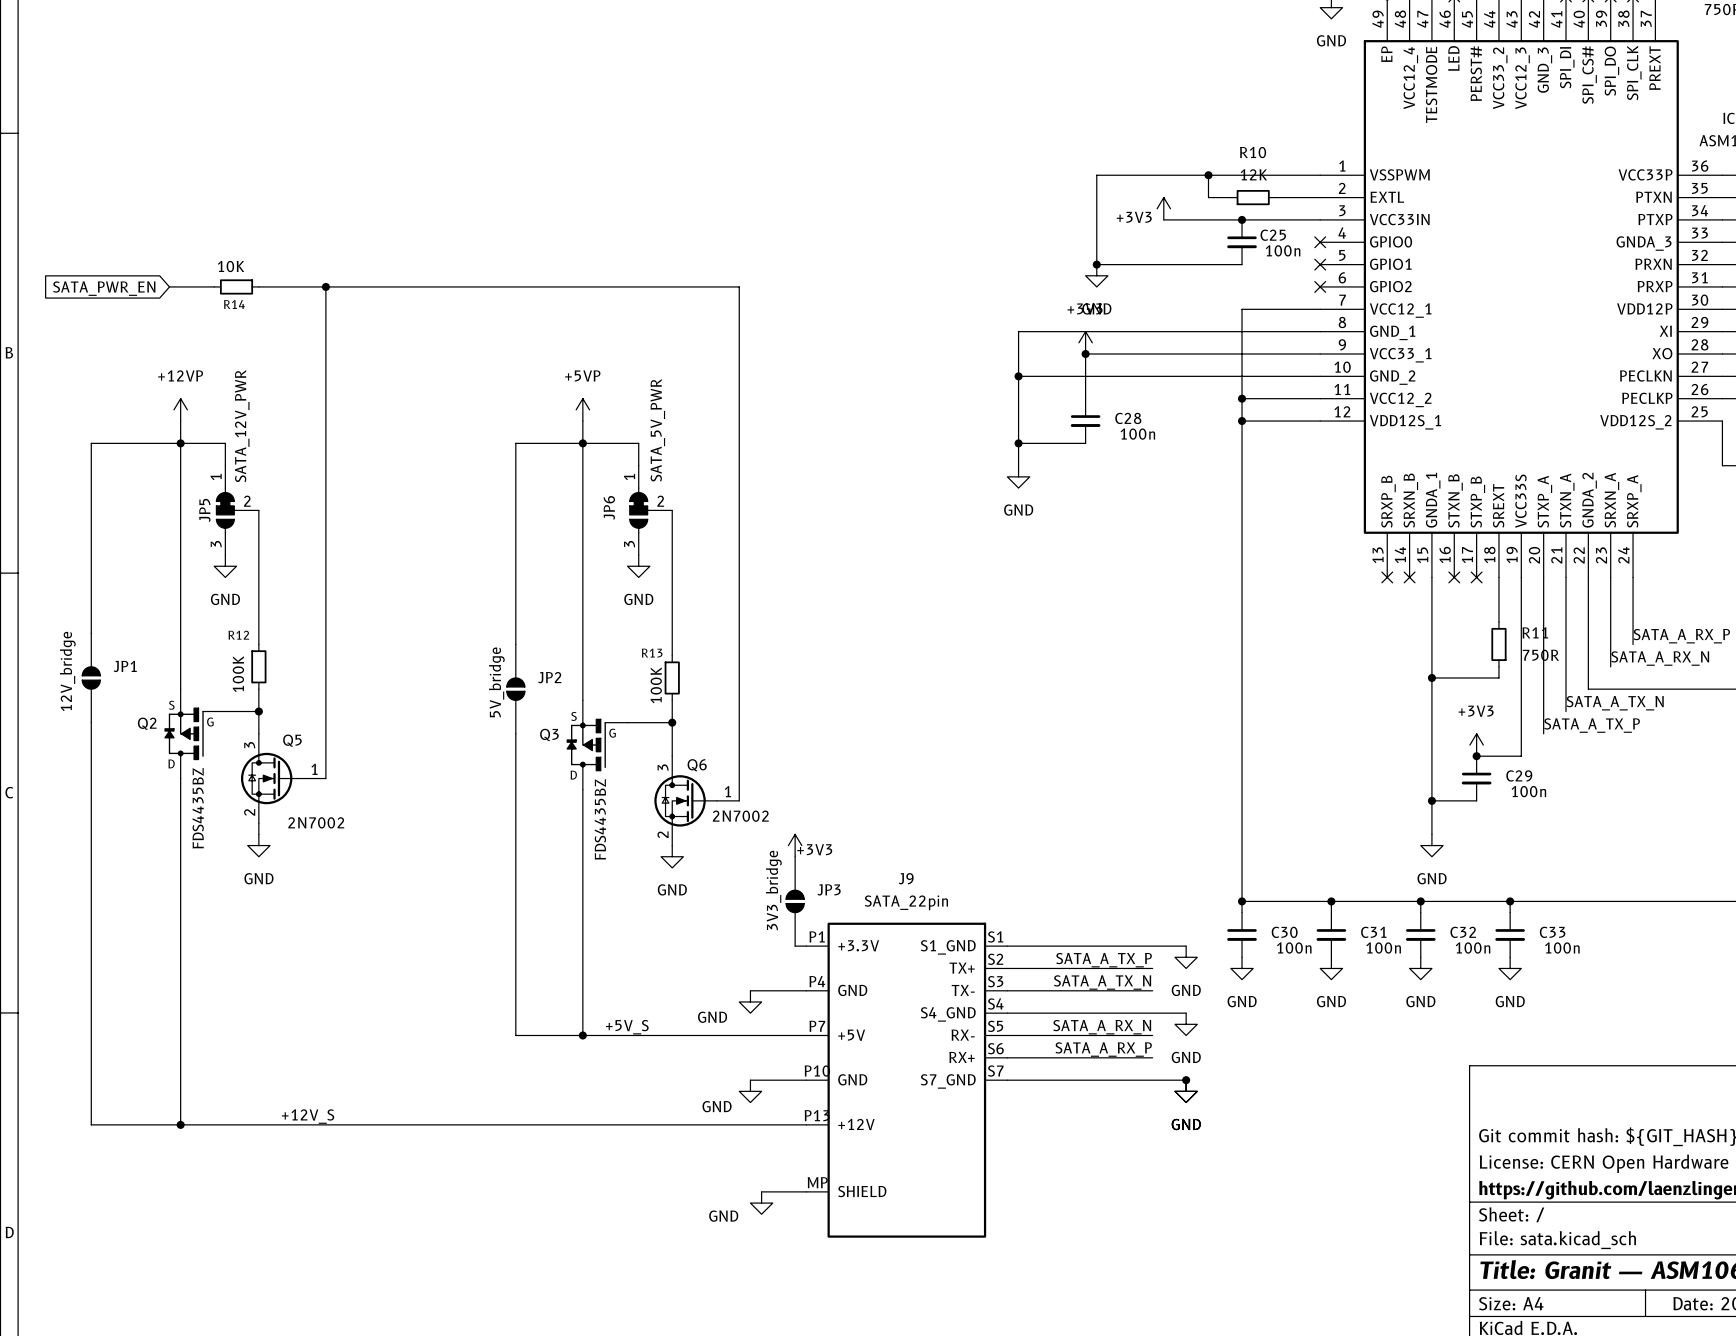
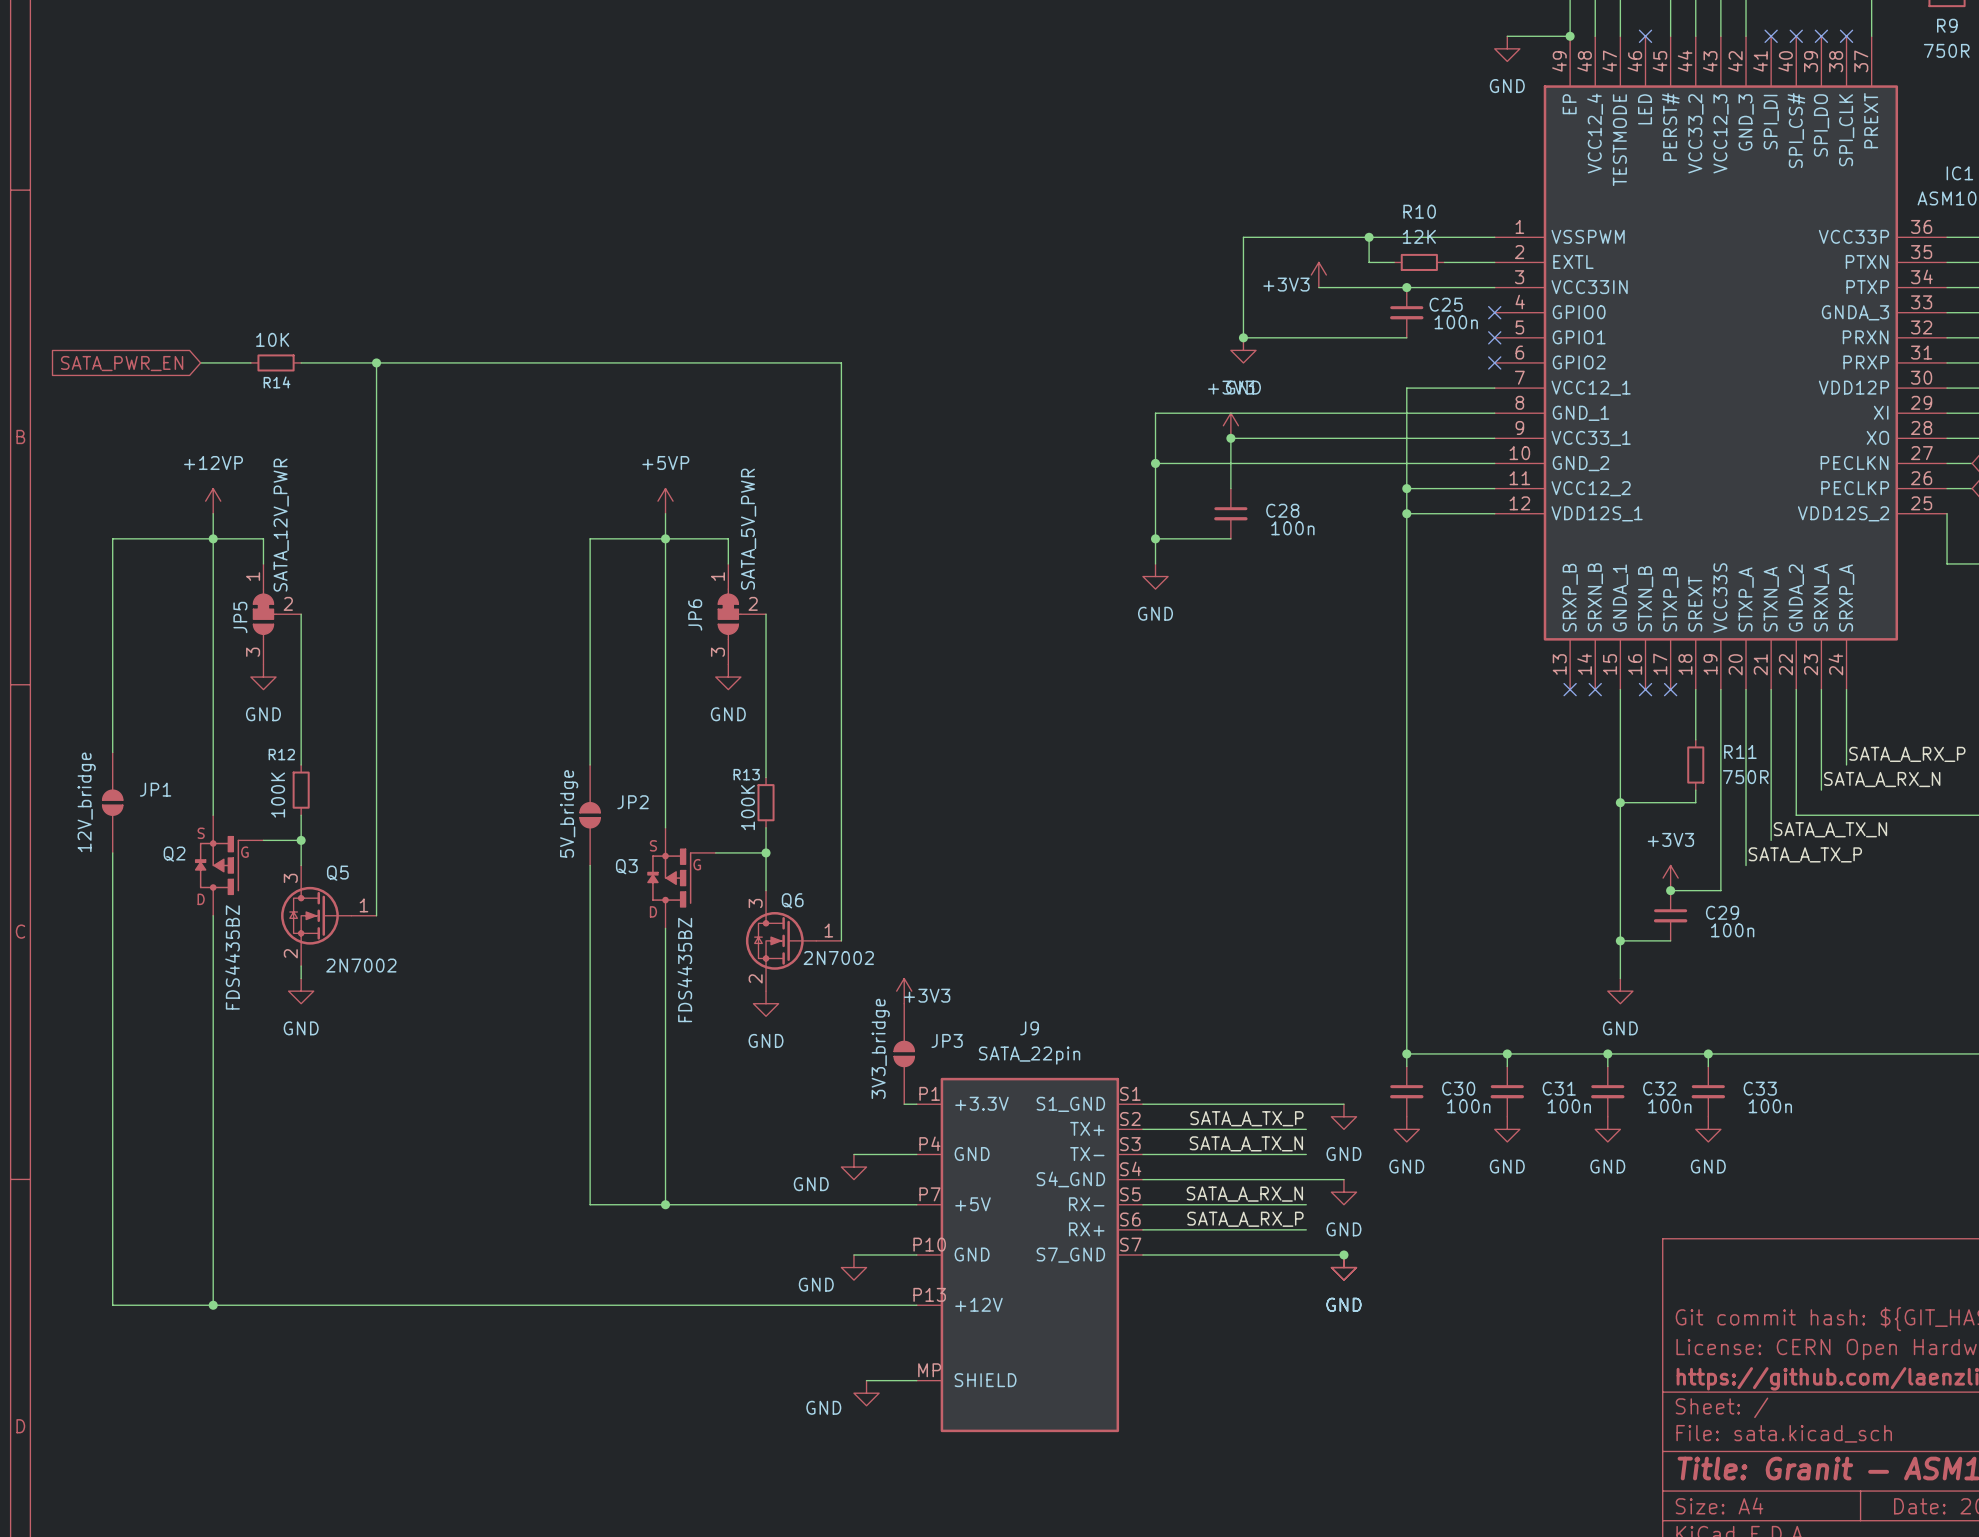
label: +5V_S (627, 1027) -> none
label: +12V_S (308, 1116) -> none

